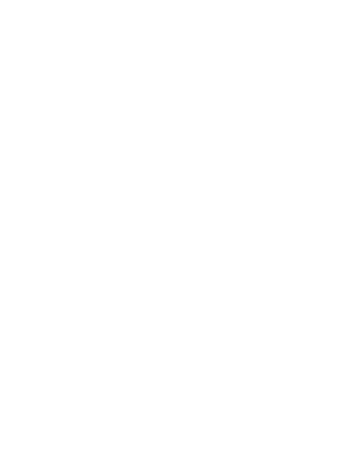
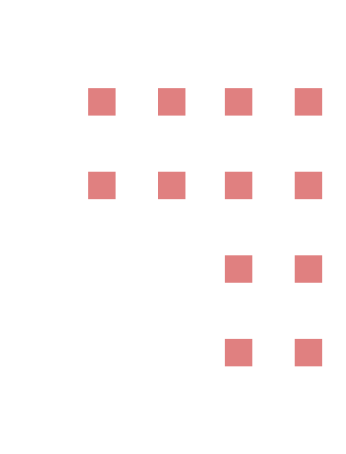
part: none -> (136, 101)
part: none -> (273, 101)
part: none -> (136, 185)
part: none -> (273, 185)
part: none -> (273, 269)
part: none -> (273, 352)

